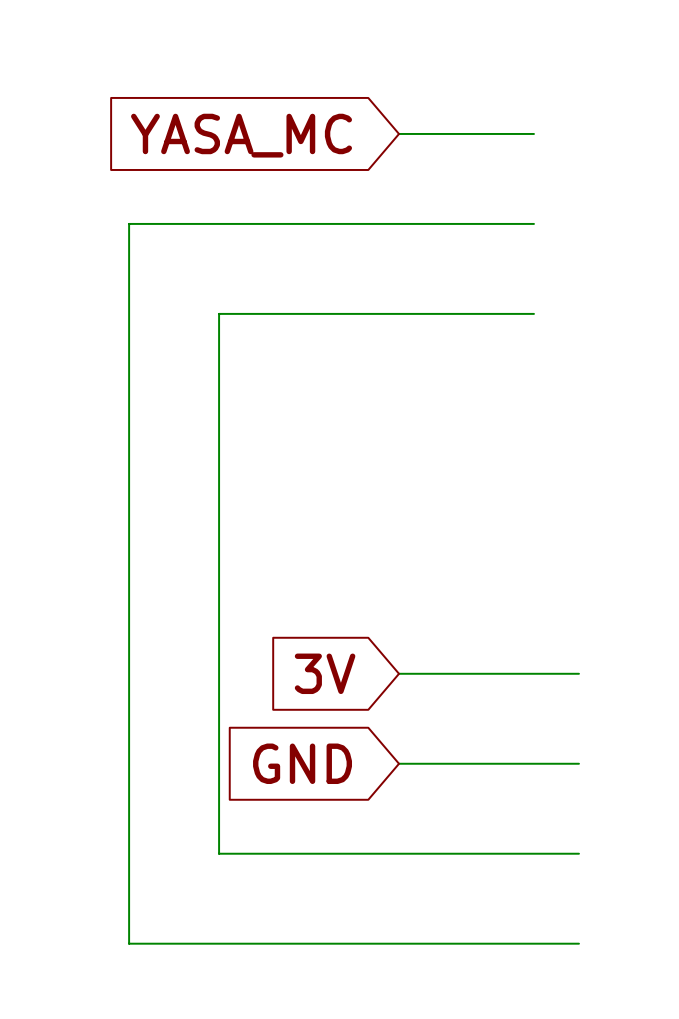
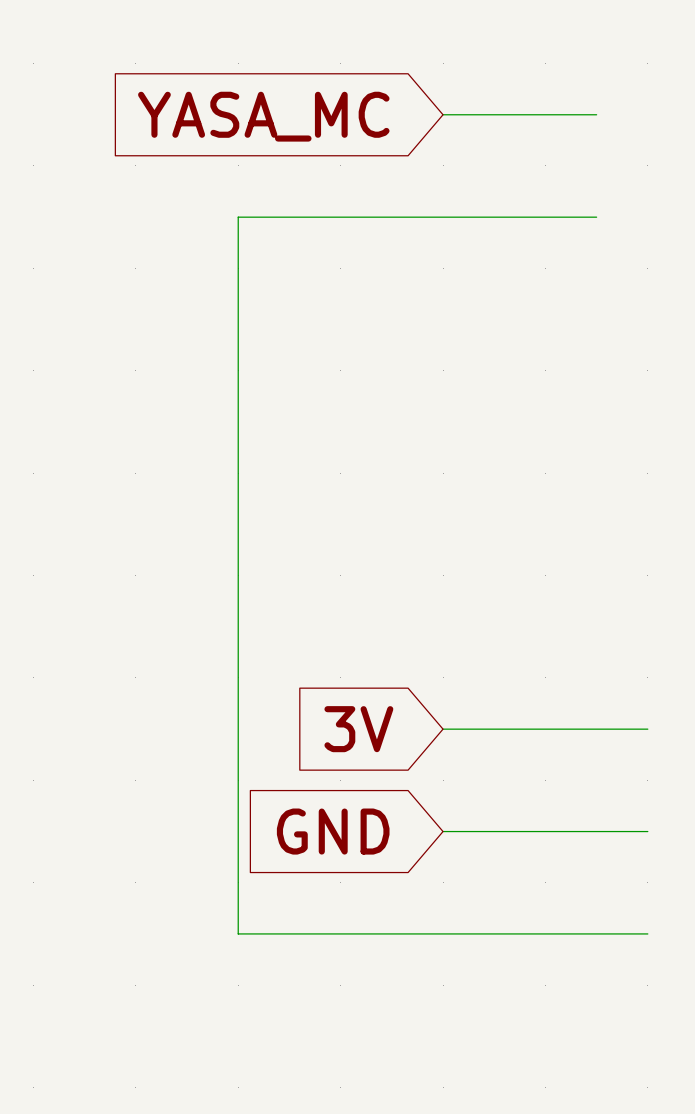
wire: (219, 223) (129, 223) (129, 943) (578, 943) -> none
wire: (219, 313) (533, 313) -> (238, 319) (238, 217)

